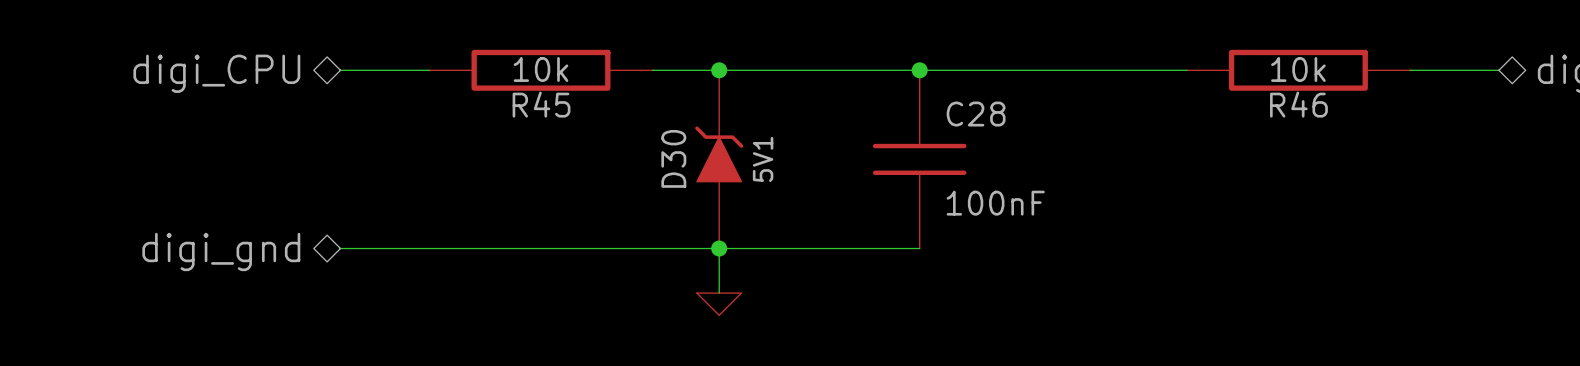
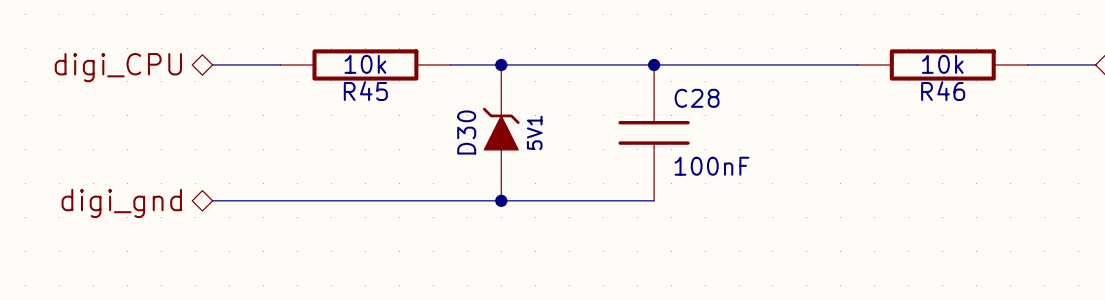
wire: (719, 248) (719, 293) -> none
power symbol: (719, 304) -> none

